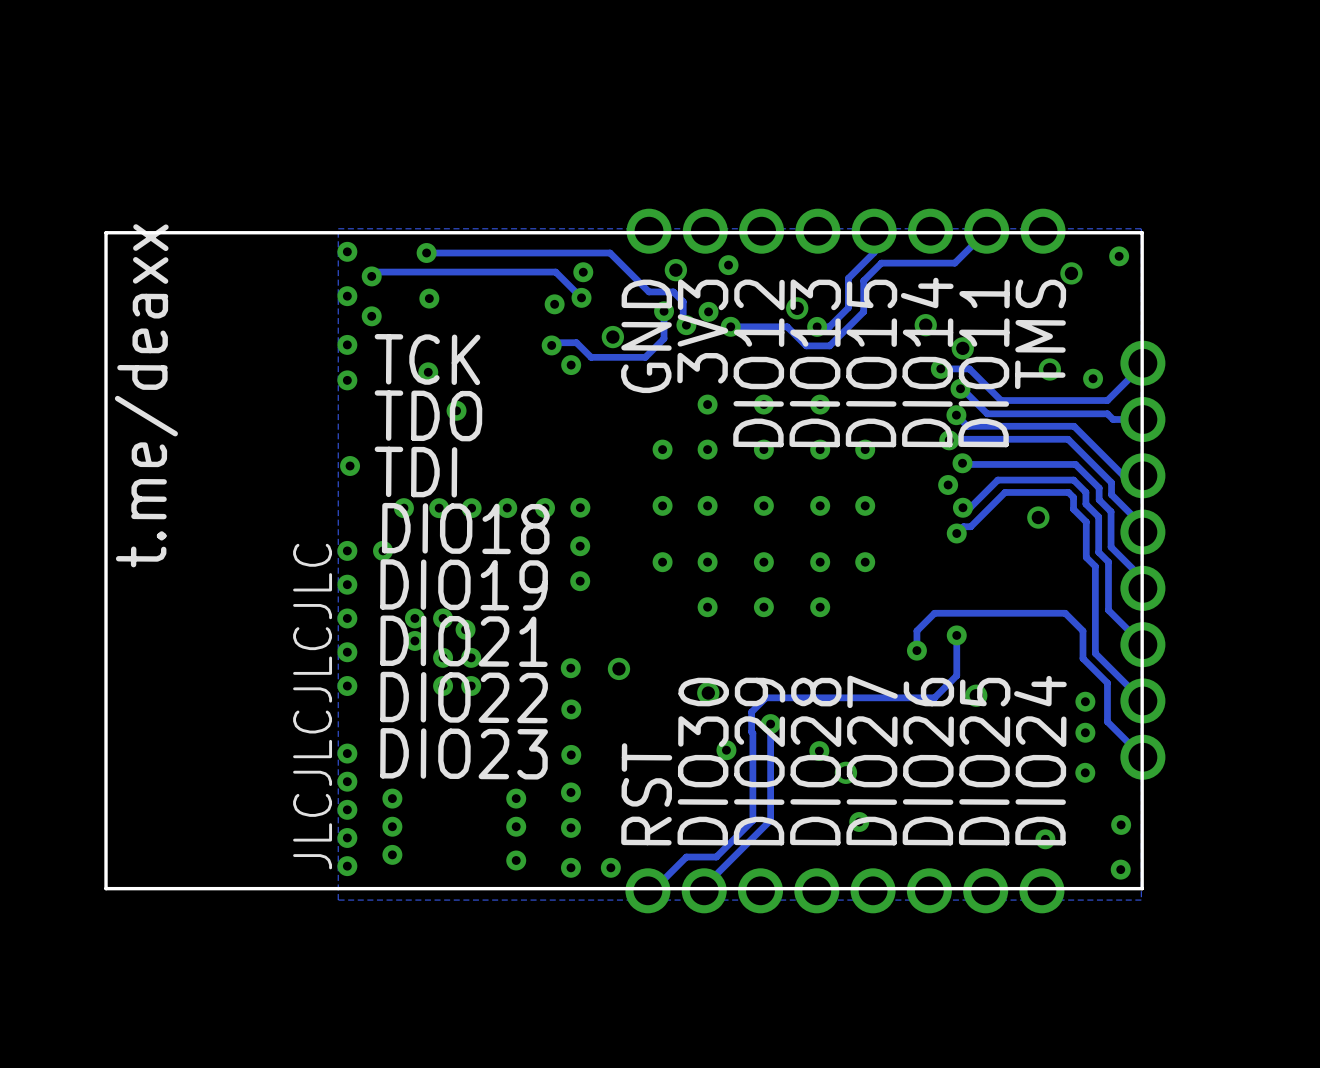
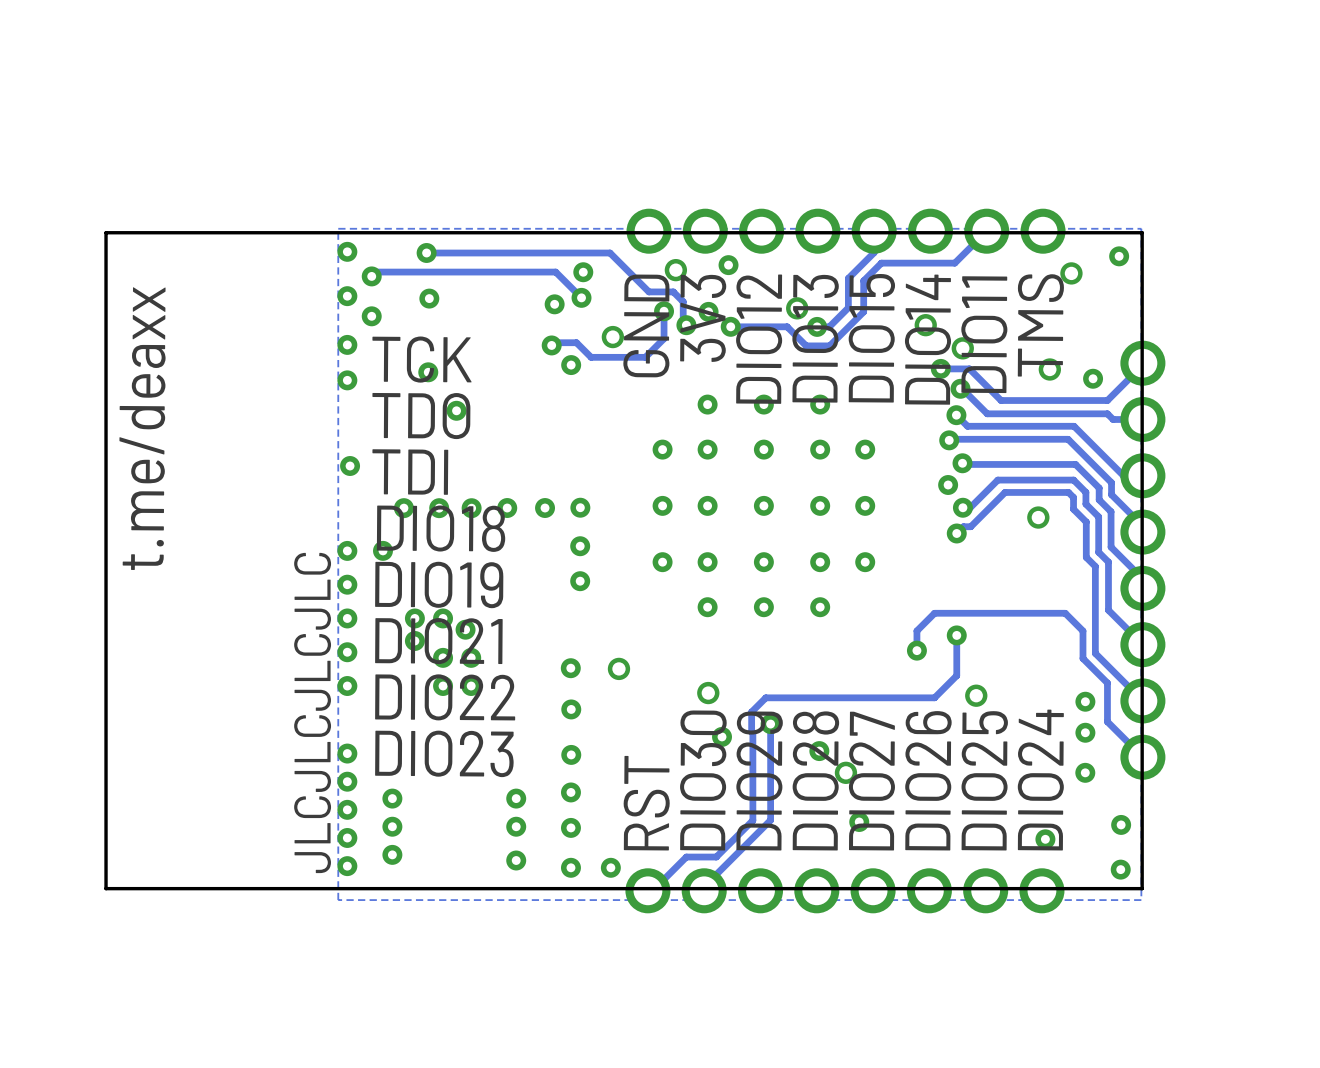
via position: (726, 750) -> (722, 736)

